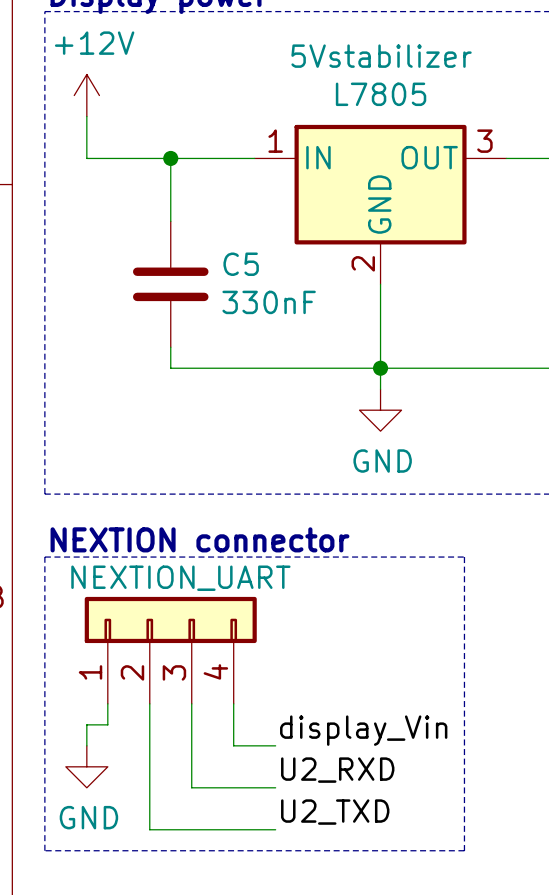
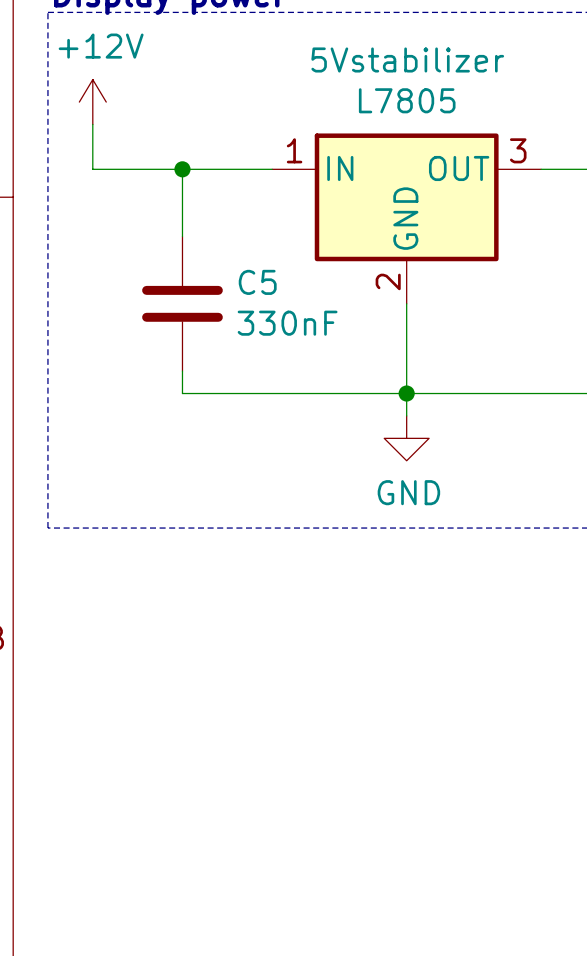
text: NEXTION connector (199, 539) -> none
line: (44, 557) (44, 850) (464, 850) (464, 557) (44, 557) -> none
NEXTION_UART: (170, 650) -> none
wire: (107, 703) (107, 724) (86, 724) (86, 745) -> none
wire: (149, 703) (149, 829) (275, 829) -> none
wire: (191, 703) (191, 787) (275, 787) -> none
wire: (233, 703) (233, 745) (275, 745) -> none
label: display_Vin (363, 730) -> none
power symbol: GND (86, 766) -> none
label: U2_RXD (337, 770) -> none
label: U2_TXD (335, 812) -> none

